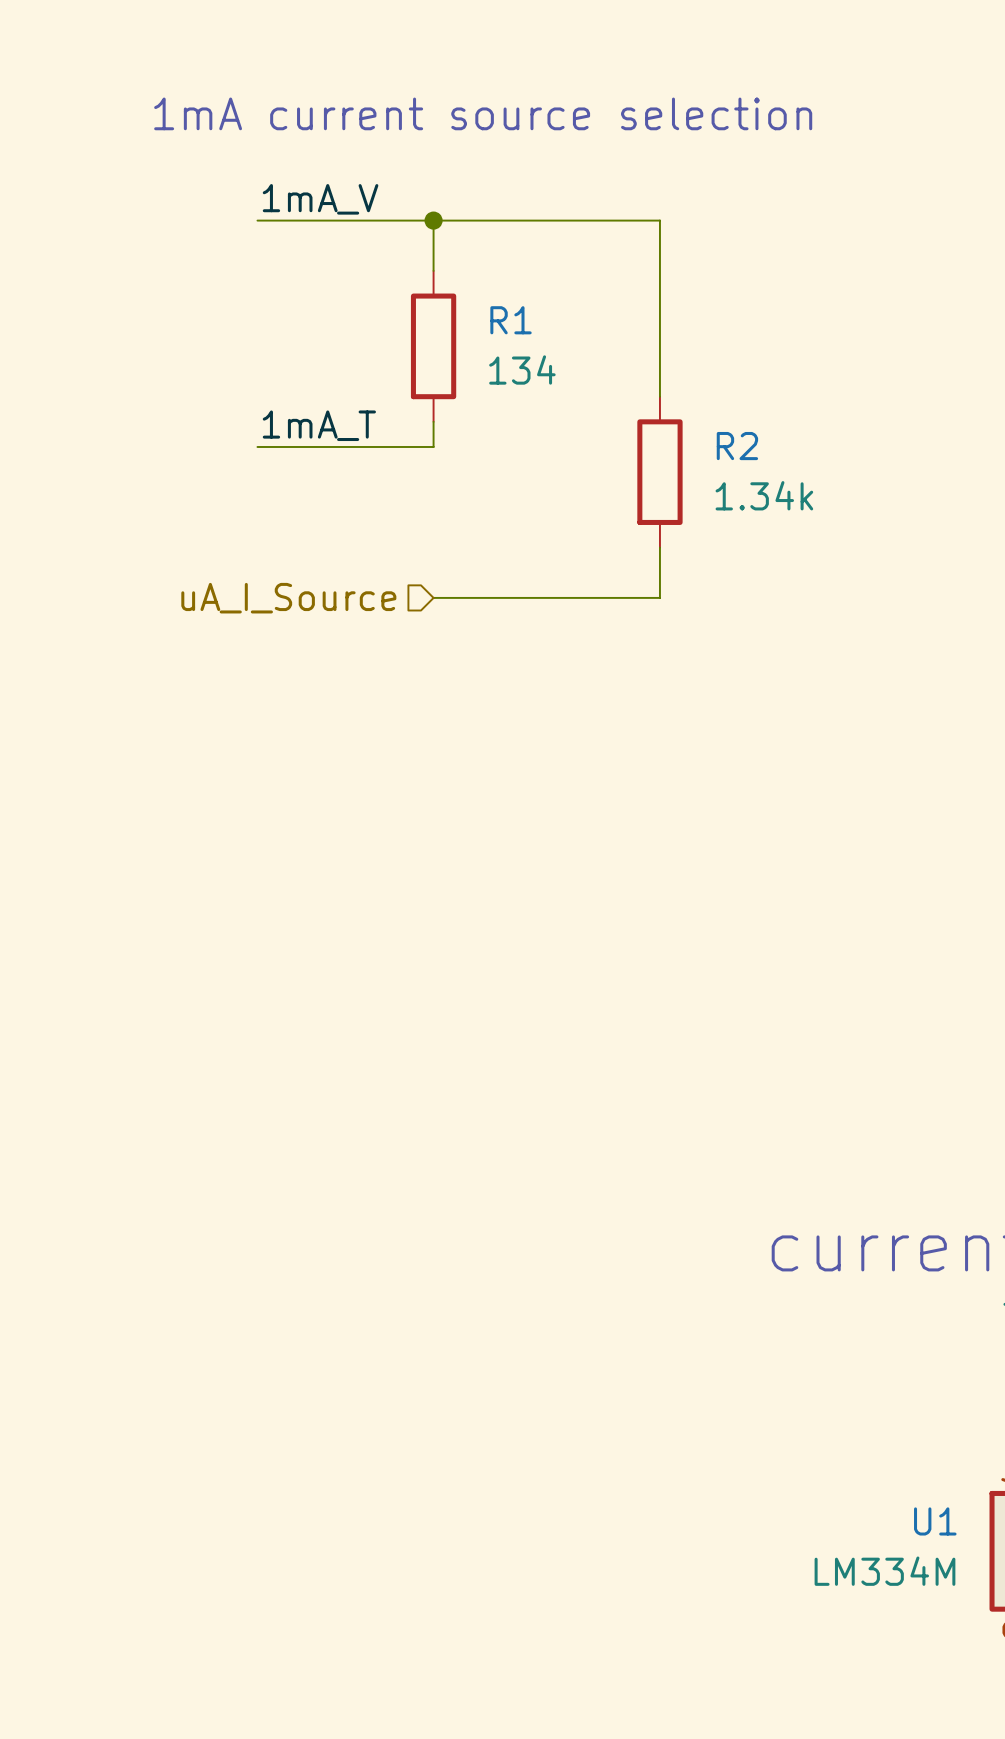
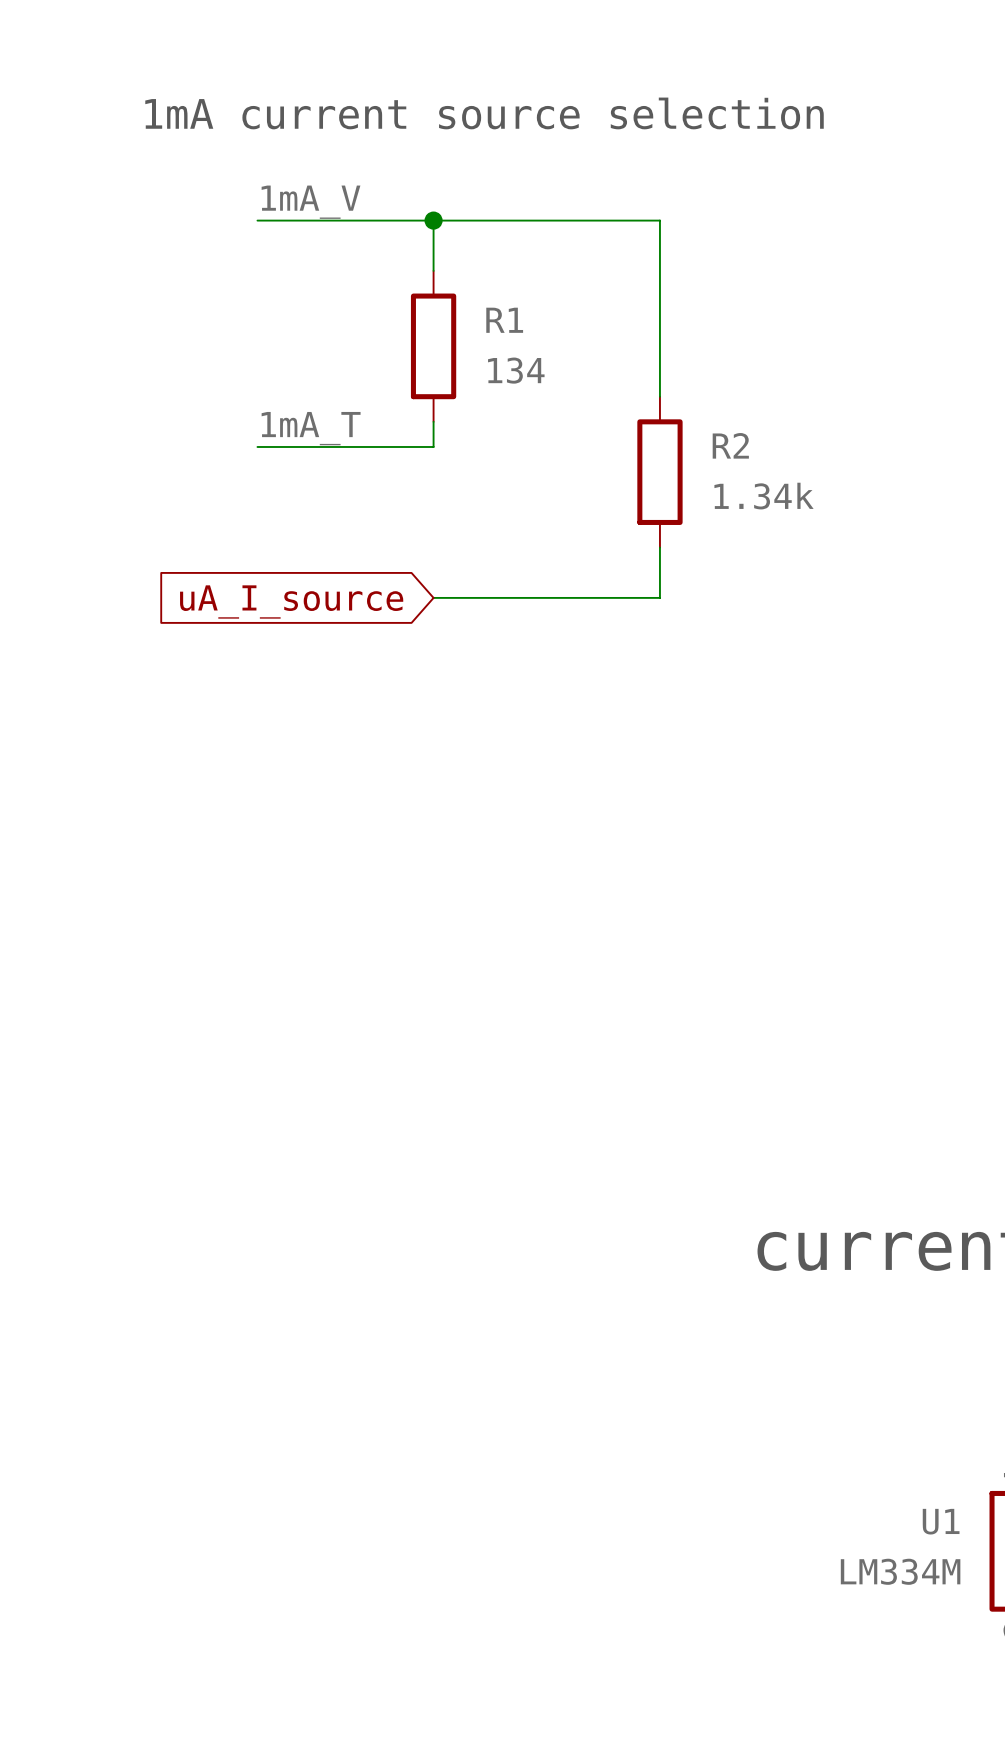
hierarchical label: uA_I_Source (288, 598) -> none
global label: none -> uA_I_source (291, 601)

